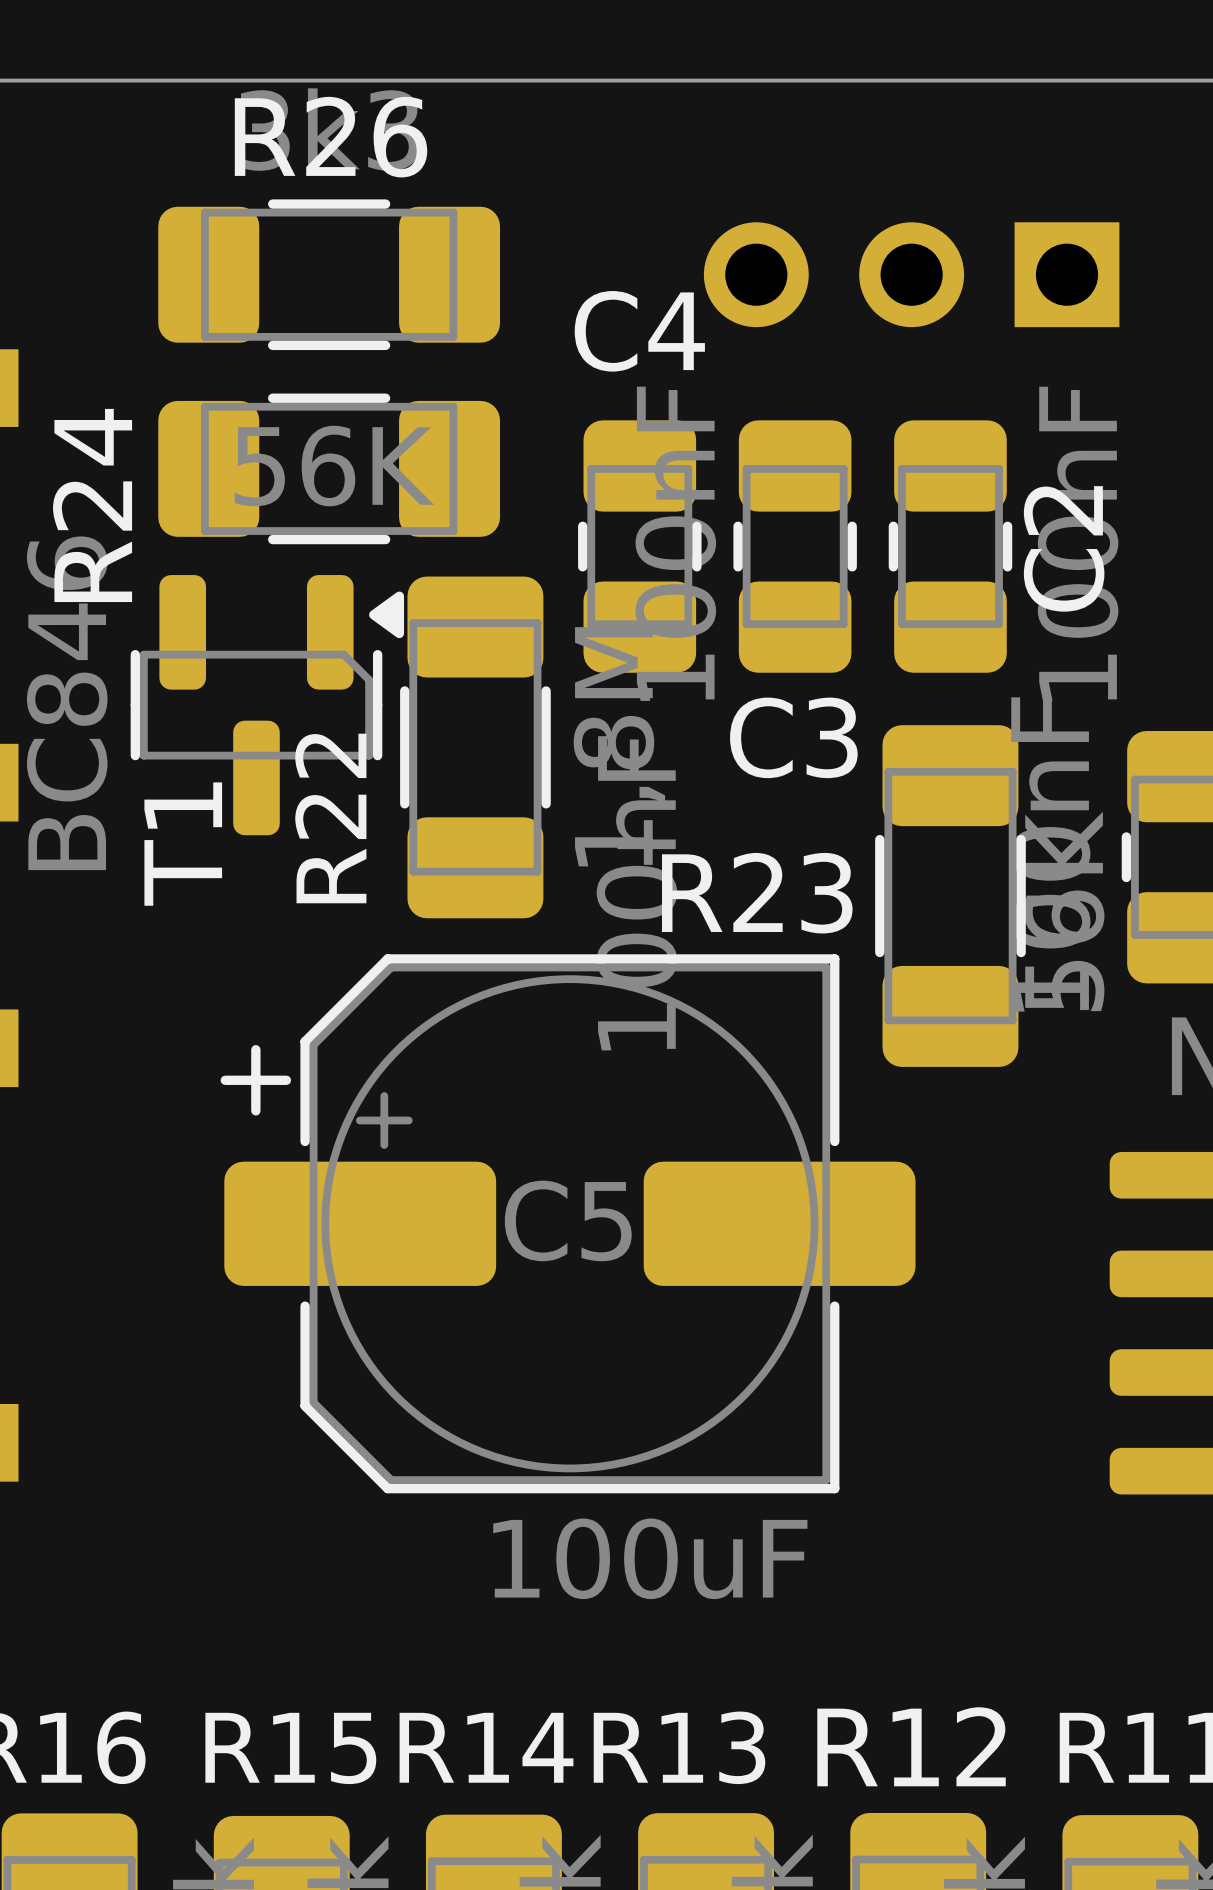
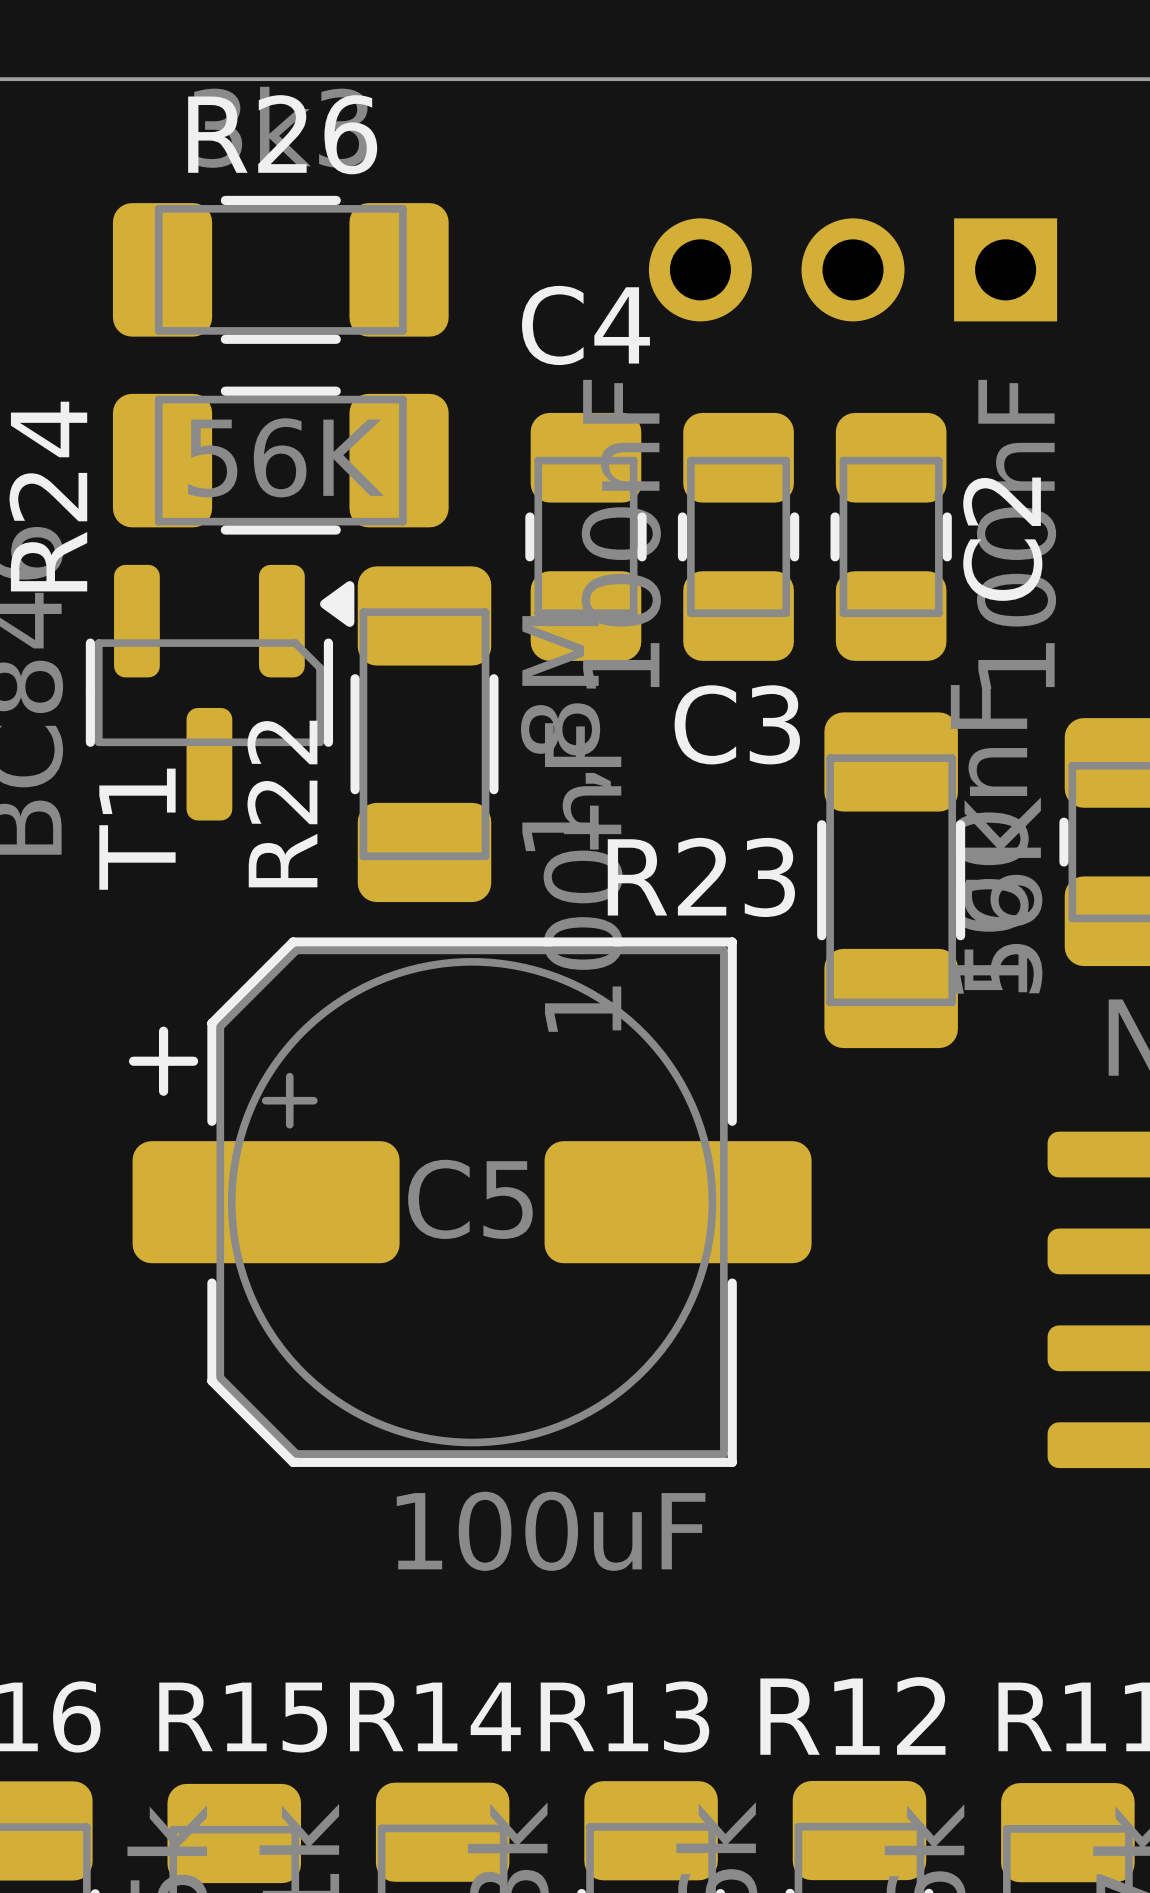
C5 position: (568, 1223) -> (470, 1202)

